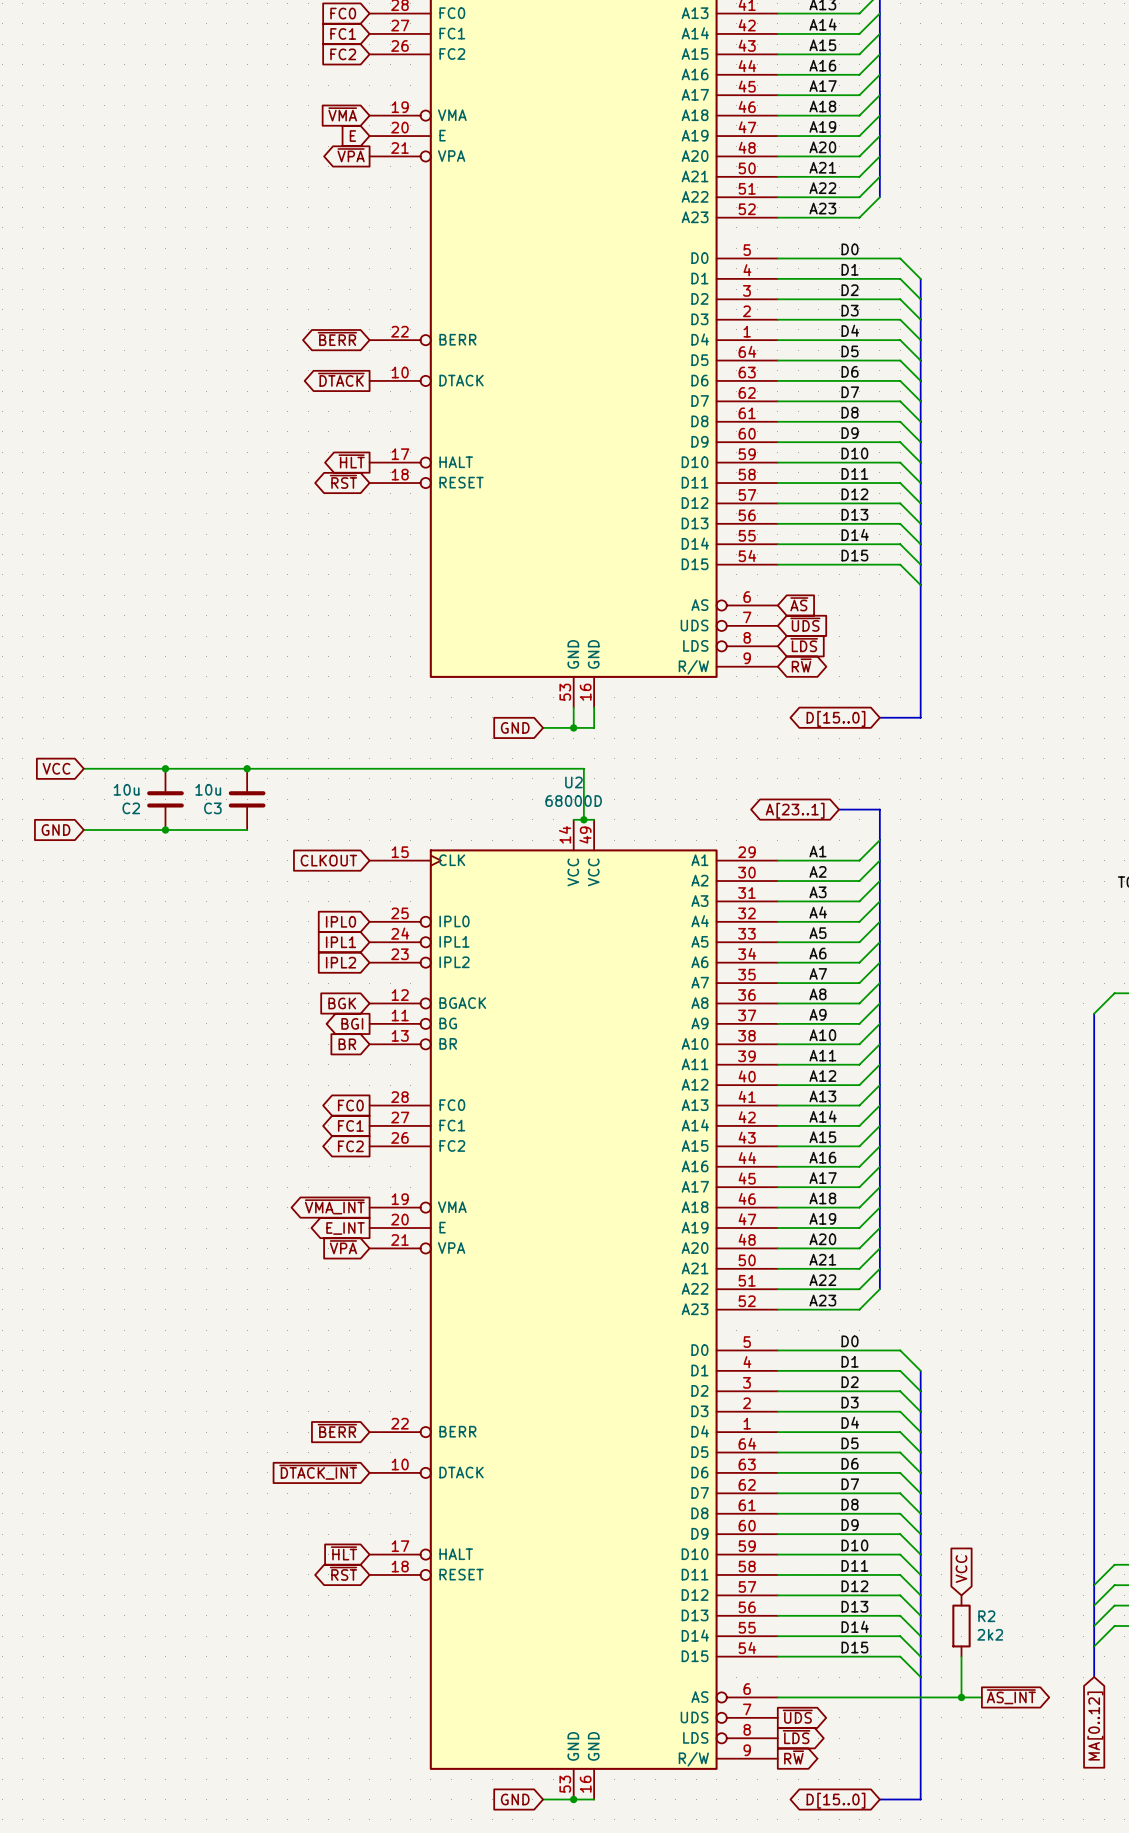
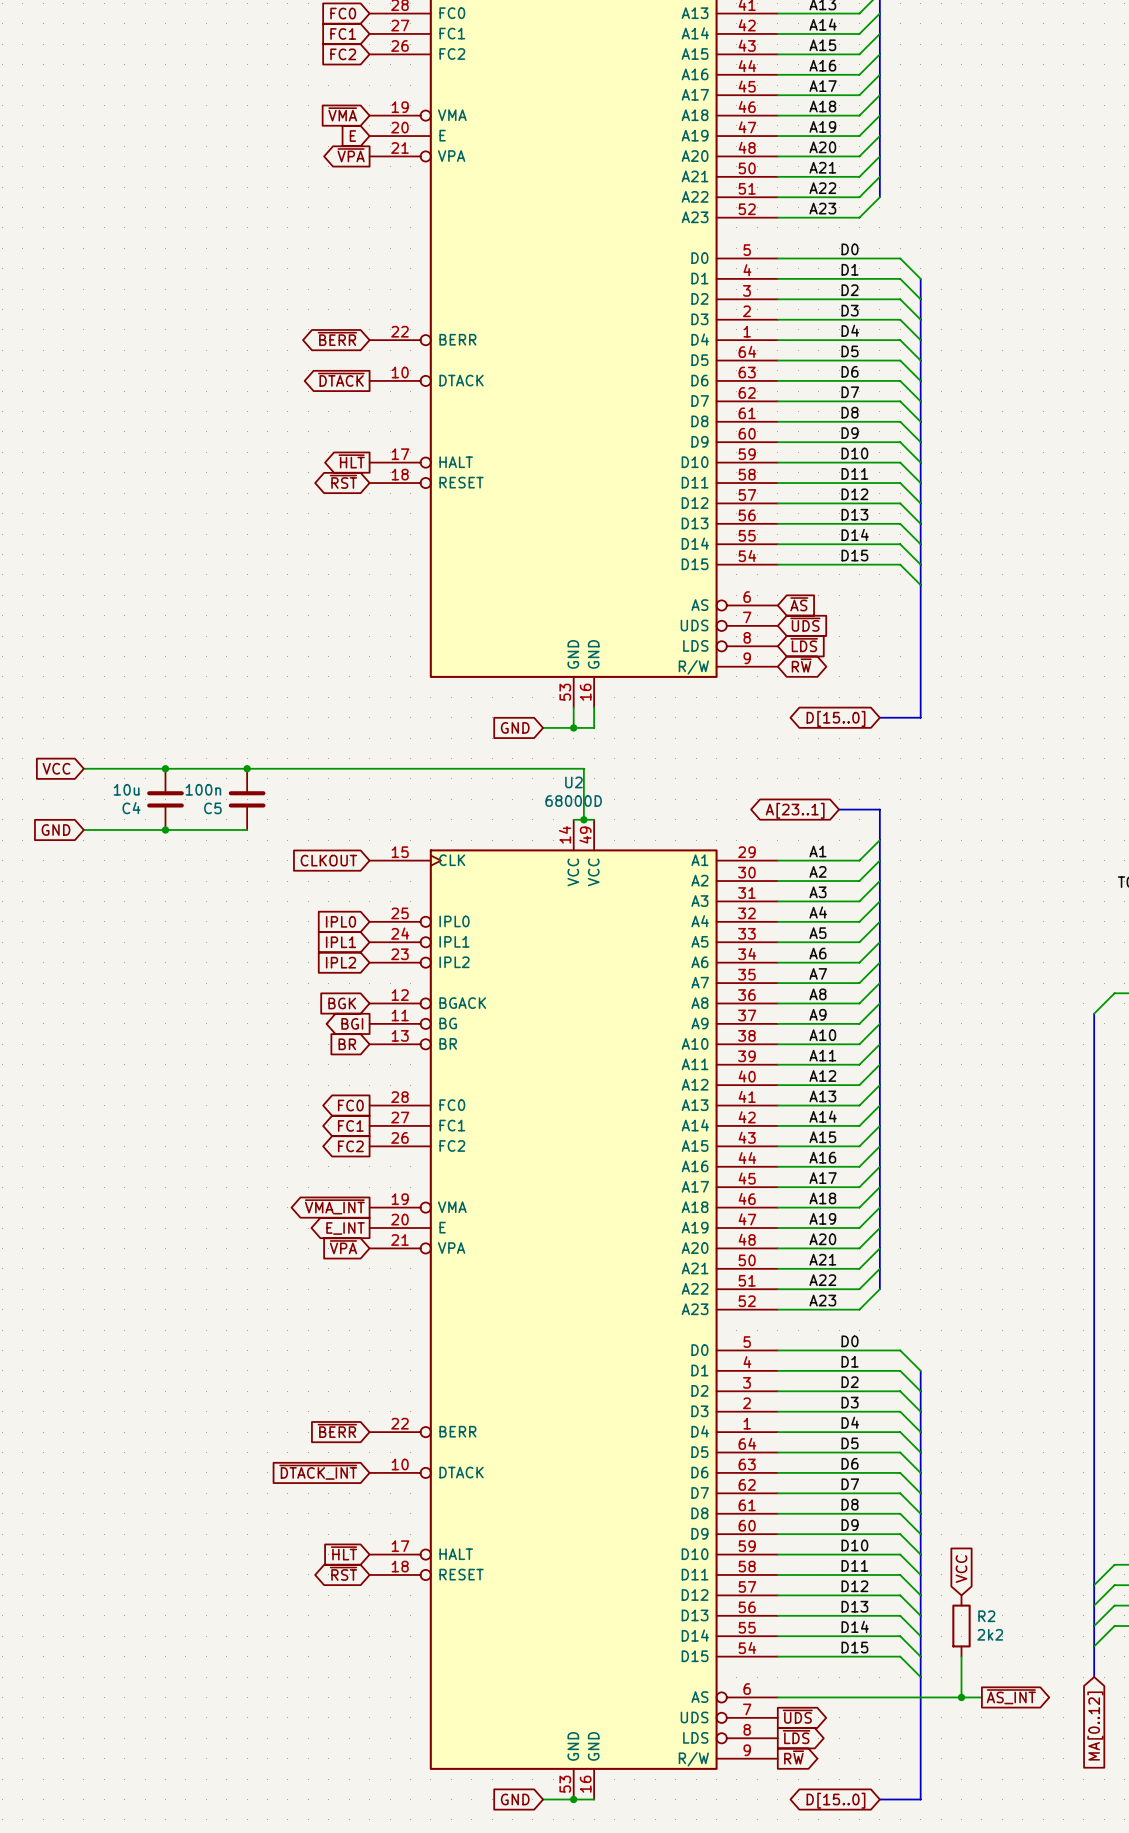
C3 value: 10u (208, 789) -> 100n (203, 789)
C2 name: C2 (131, 808) -> C4 (131, 808)
C3 name: C3 (212, 808) -> C5 (212, 808)

